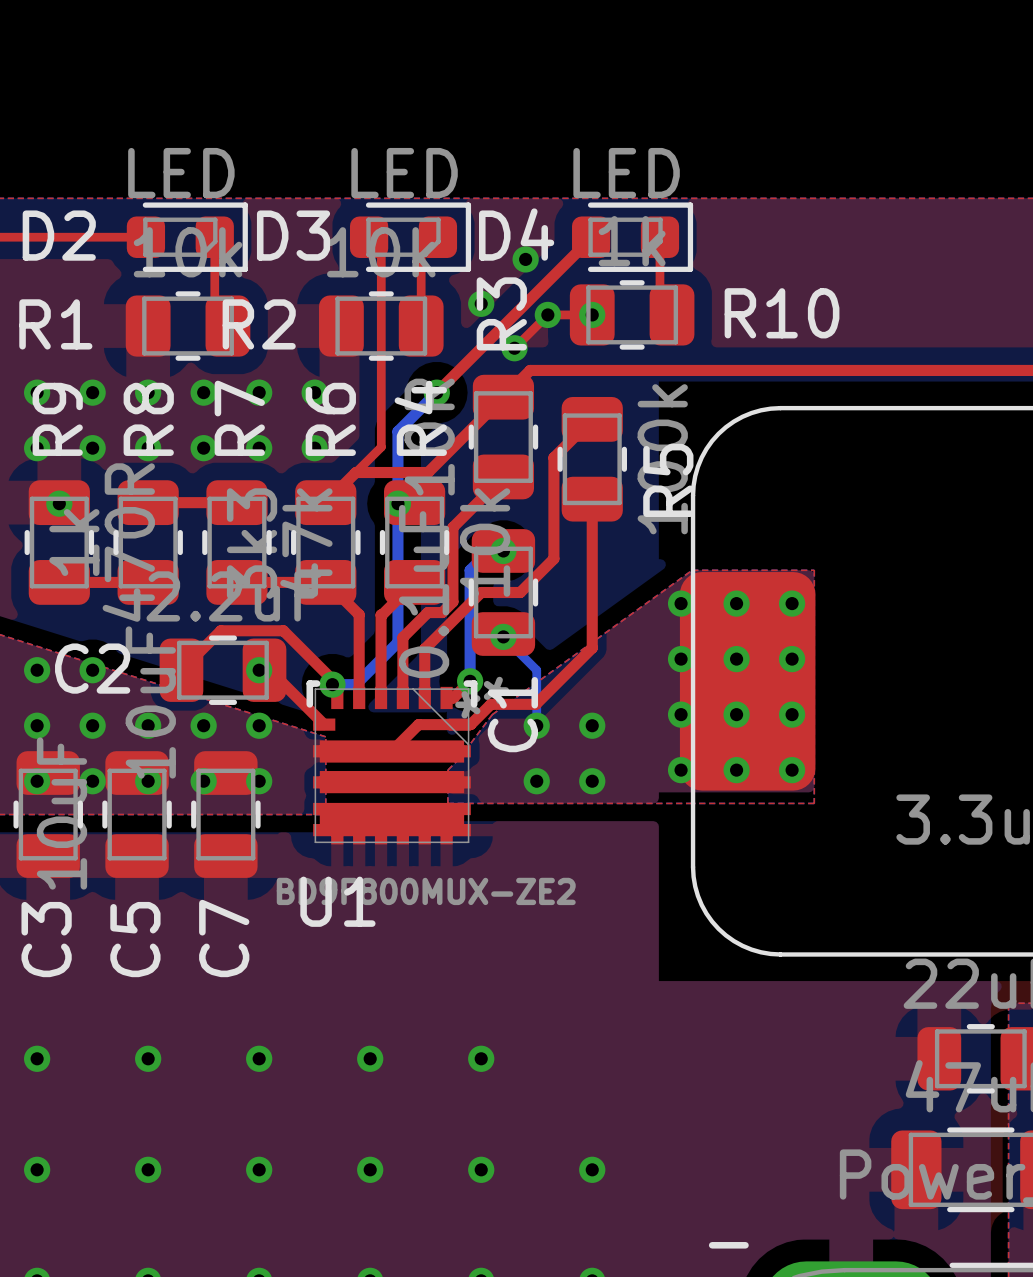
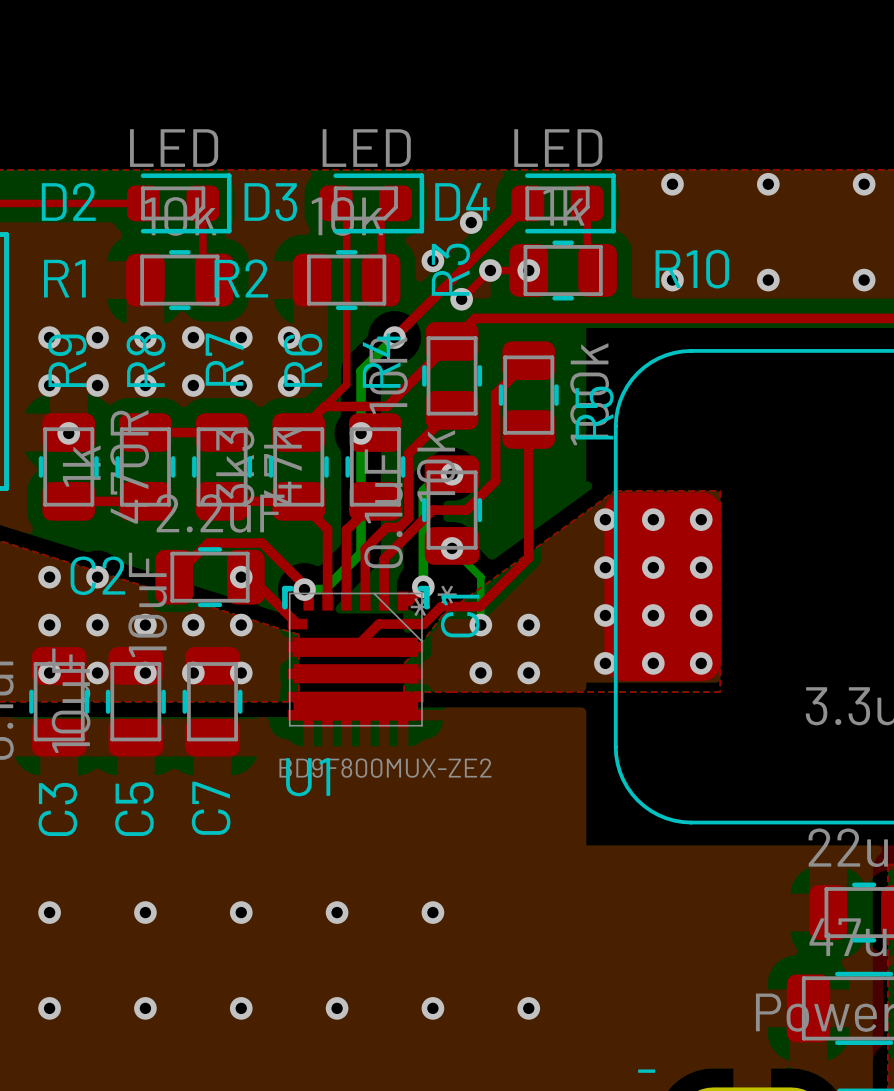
via: none -> (672, 184)
via: none -> (768, 184)
via: none -> (864, 184)
via: none -> (672, 280)
via: none -> (768, 280)
via: none -> (864, 280)

